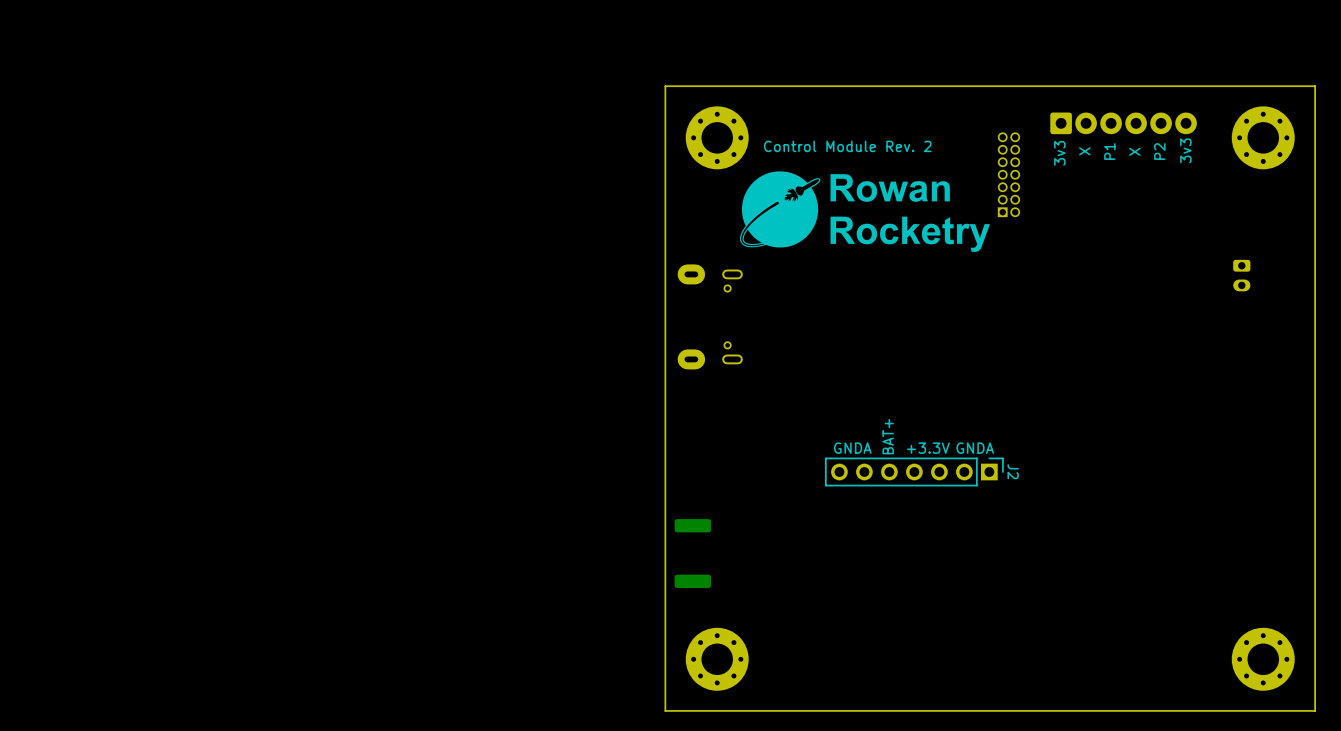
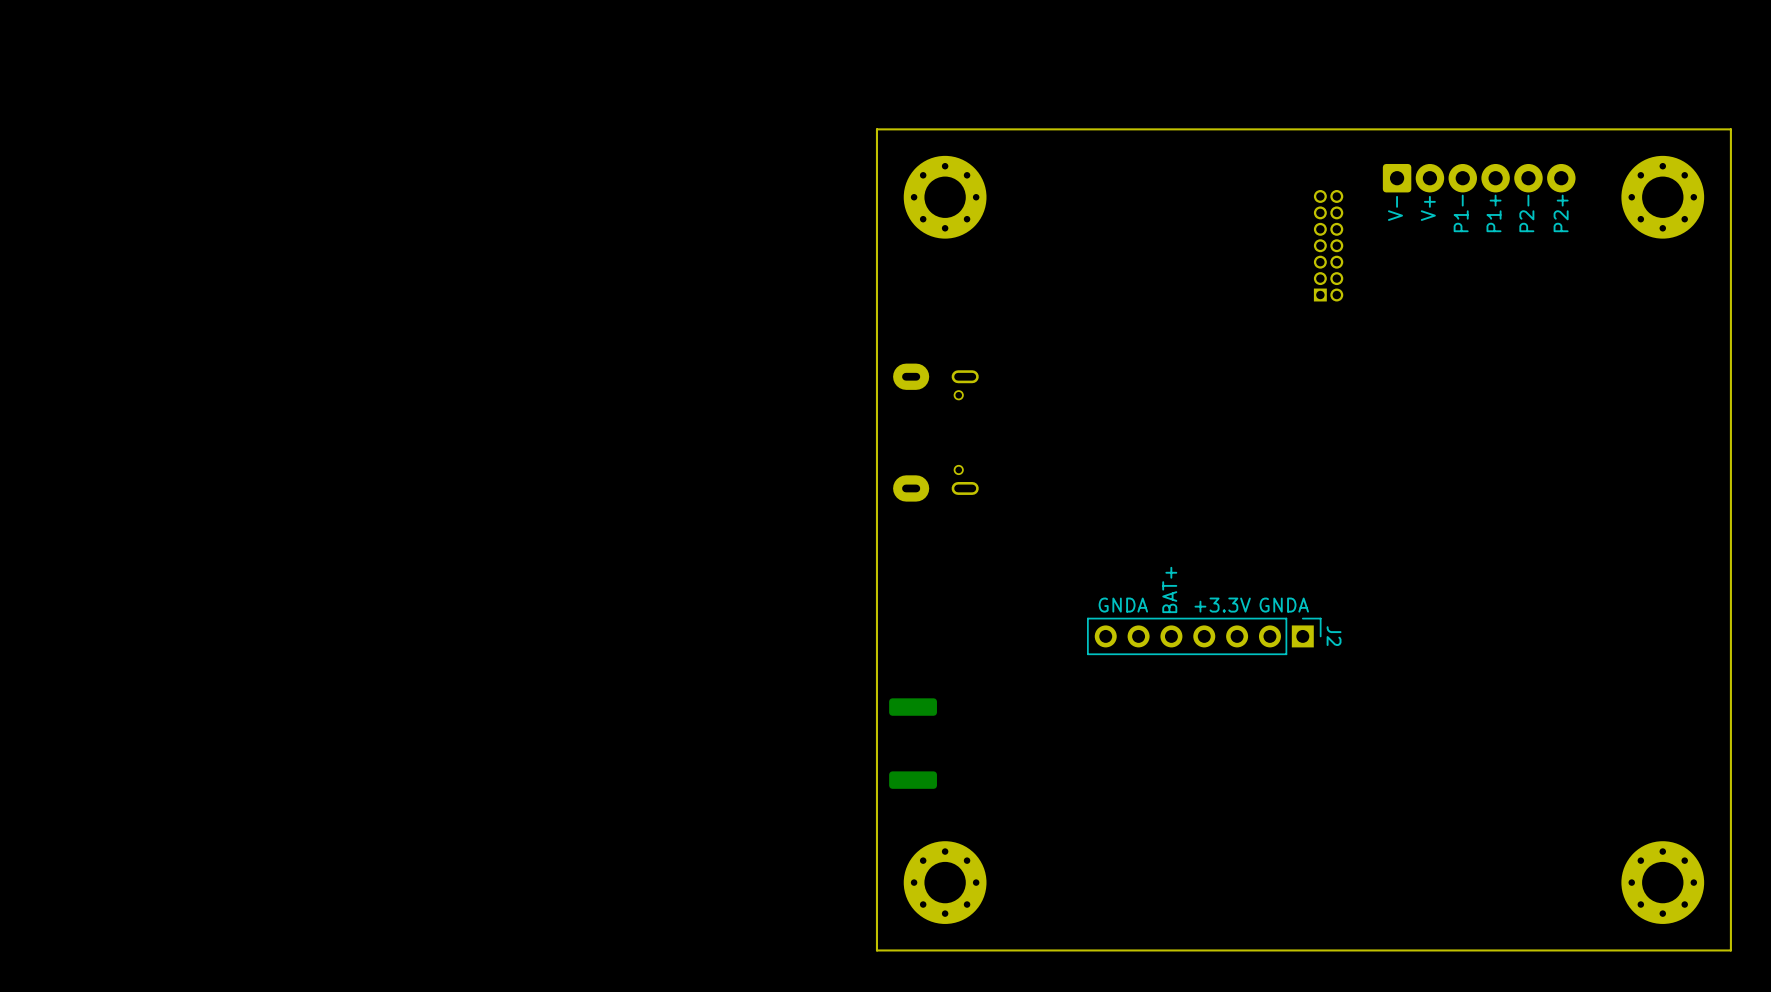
text: Control Module Rev. 2 (847, 146) -> none
text: none -> V- (1395, 208)
text: 3v3 (1185, 150) -> P2+ (1561, 213)
text: X (1084, 151) -> V+ (1428, 208)
text: P1 (1109, 151) -> P1- (1461, 213)
text: X (1134, 151) -> P1+ (1494, 213)
text: P2 (1159, 151) -> P2- (1526, 213)
text: 3v3 (1059, 153) -> none
drawing: [740, 171, 990, 252] -> none
part: (1241, 275) -> none

